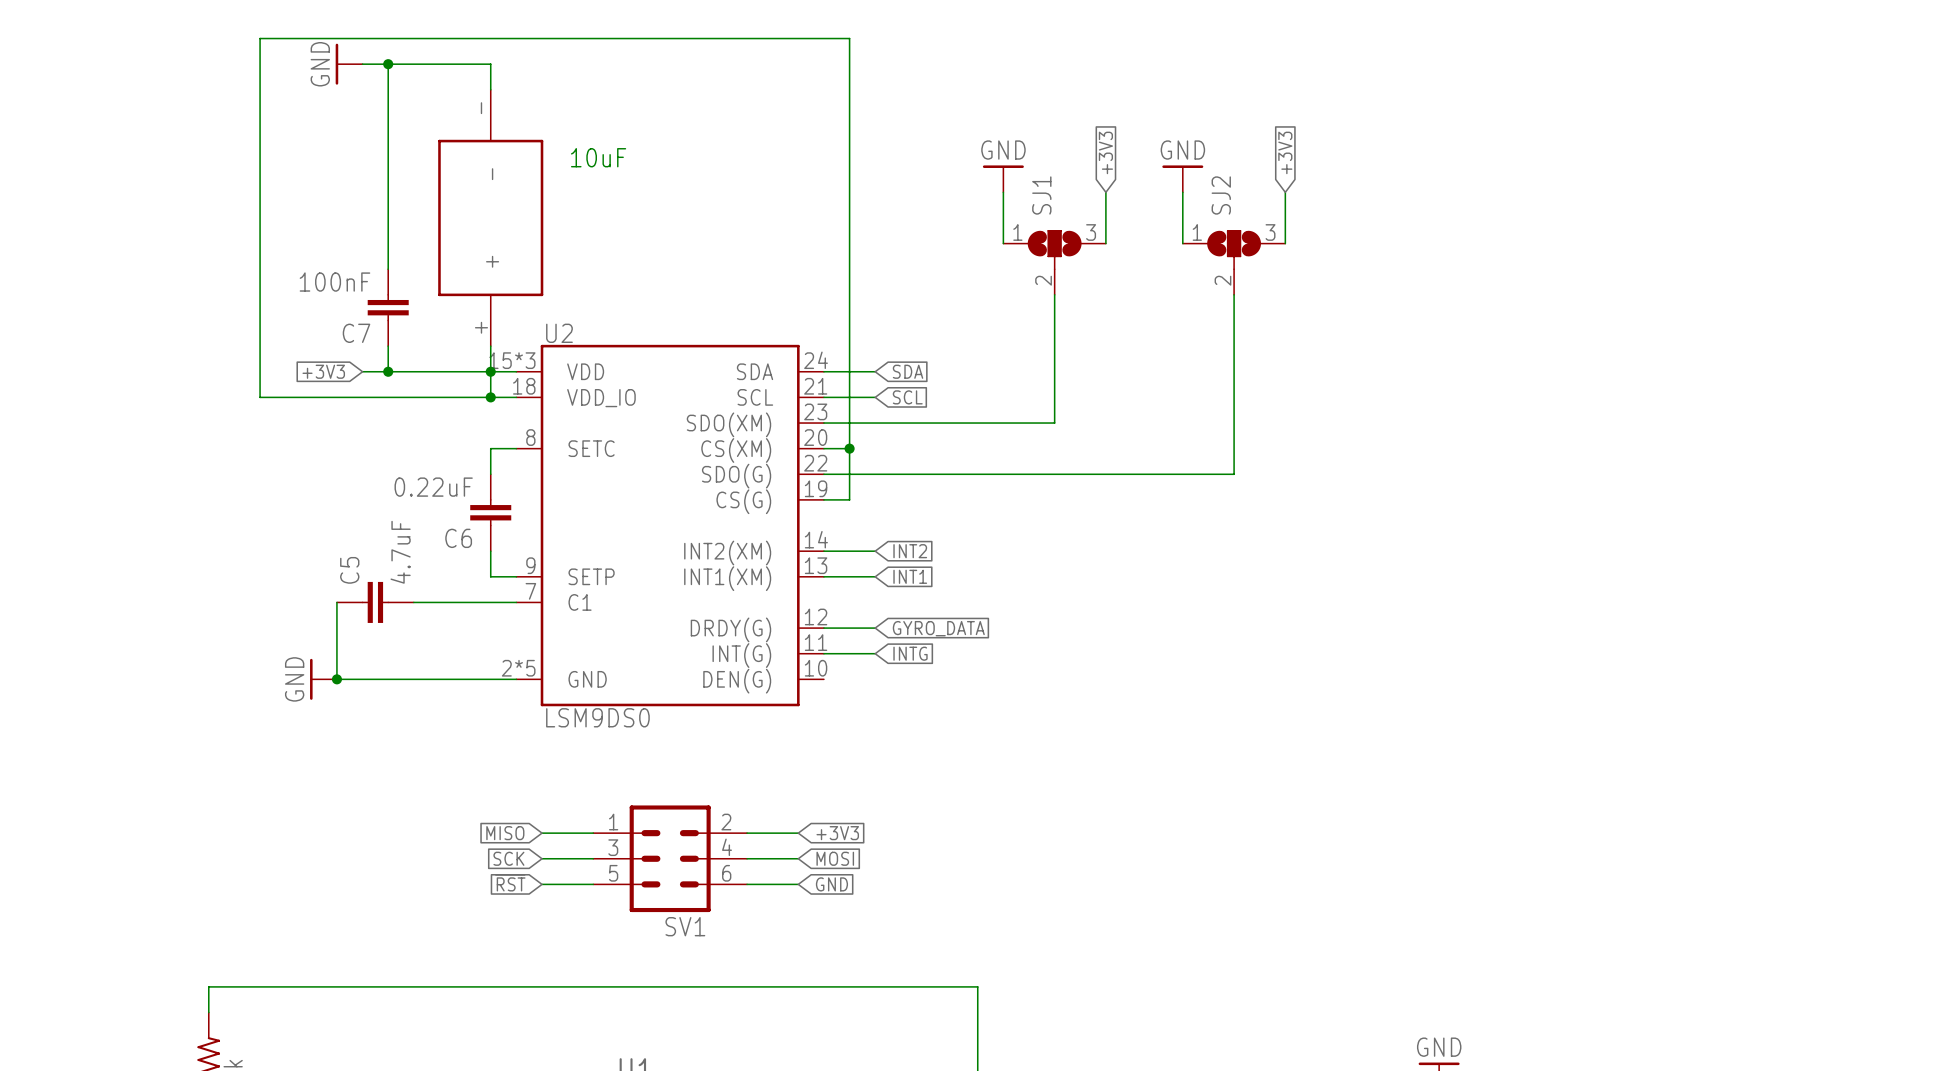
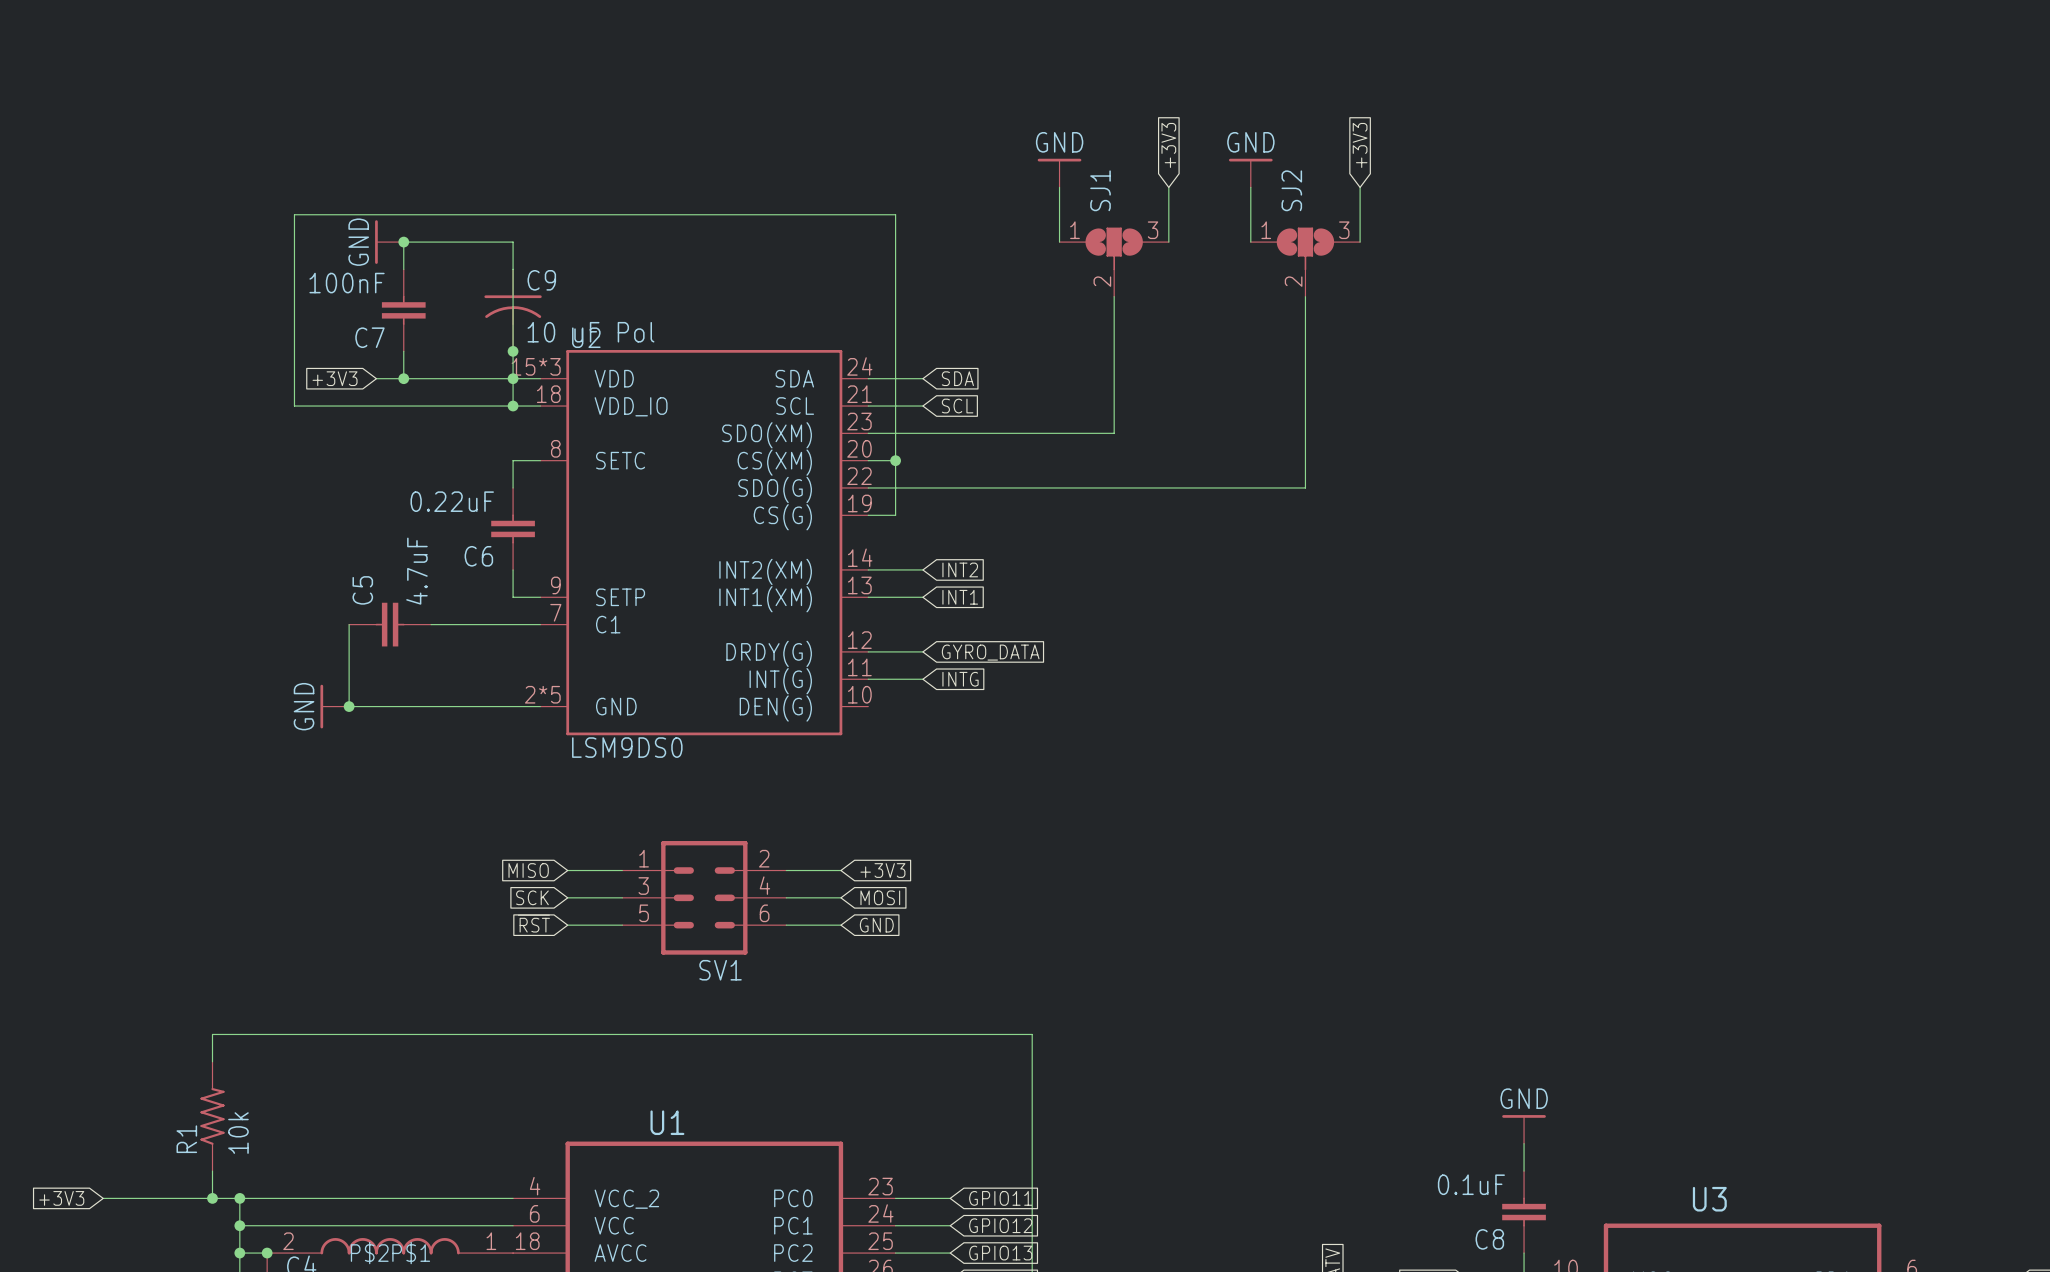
power symbol position: GND (349, 64) -> GND (389, 242)
wire: (362, 64) (490, 64) (490, 89) -> none
wire: (388, 64) (388, 243) -> (513, 351) (513, 242) (403, 242)
junction: (388, 64) -> none
text: 10uF (598, 157) -> none
part: (490, 217) -> none
wire: (849, 217) (849, 38) (260, 38) (260, 397) (285, 397) -> (895, 214) (294, 214) (294, 406)
junction: none -> (403, 242)
C9: none -> 10 uF Pol (513, 310)
junction: none -> (513, 351)

